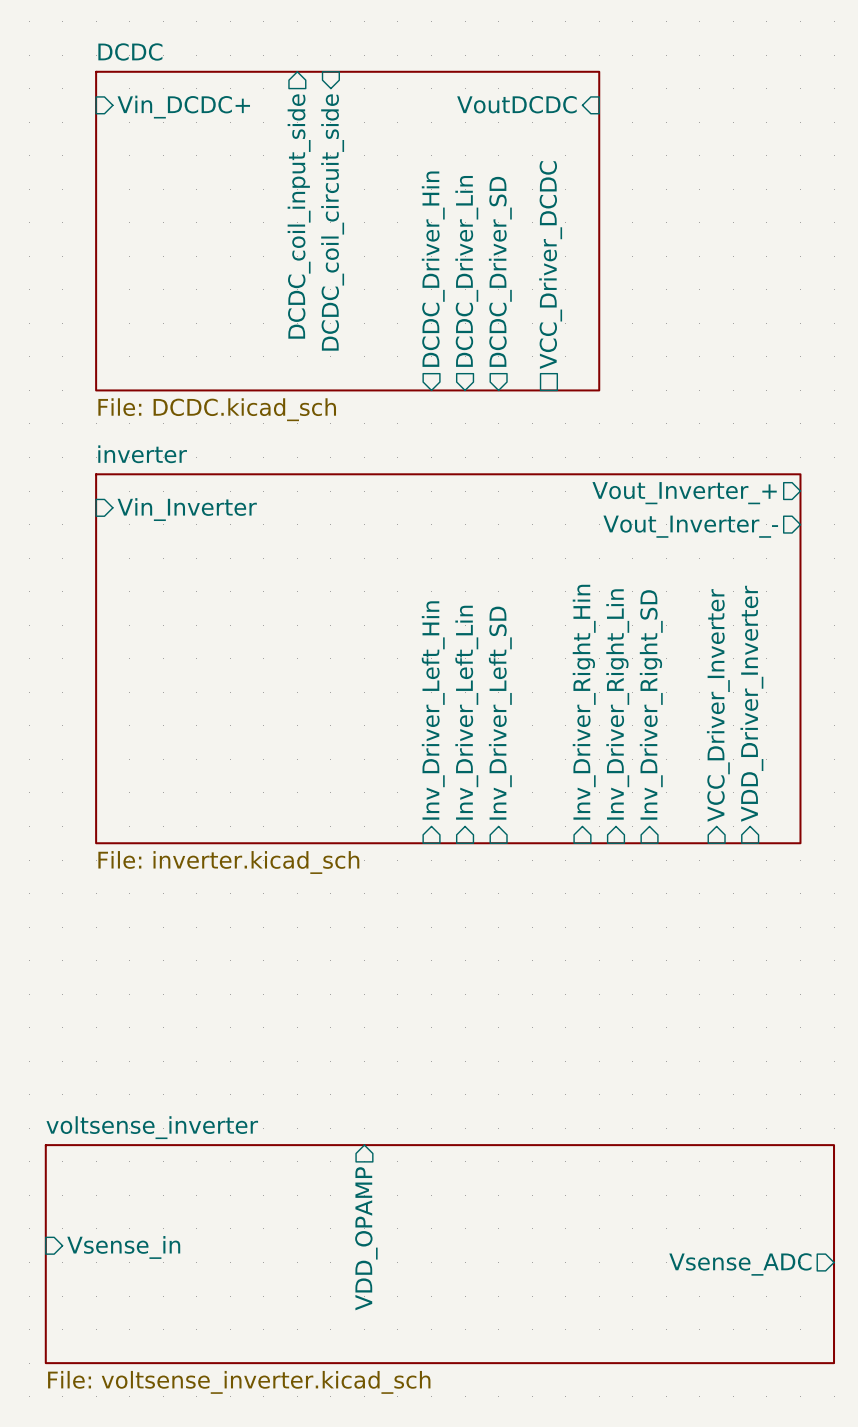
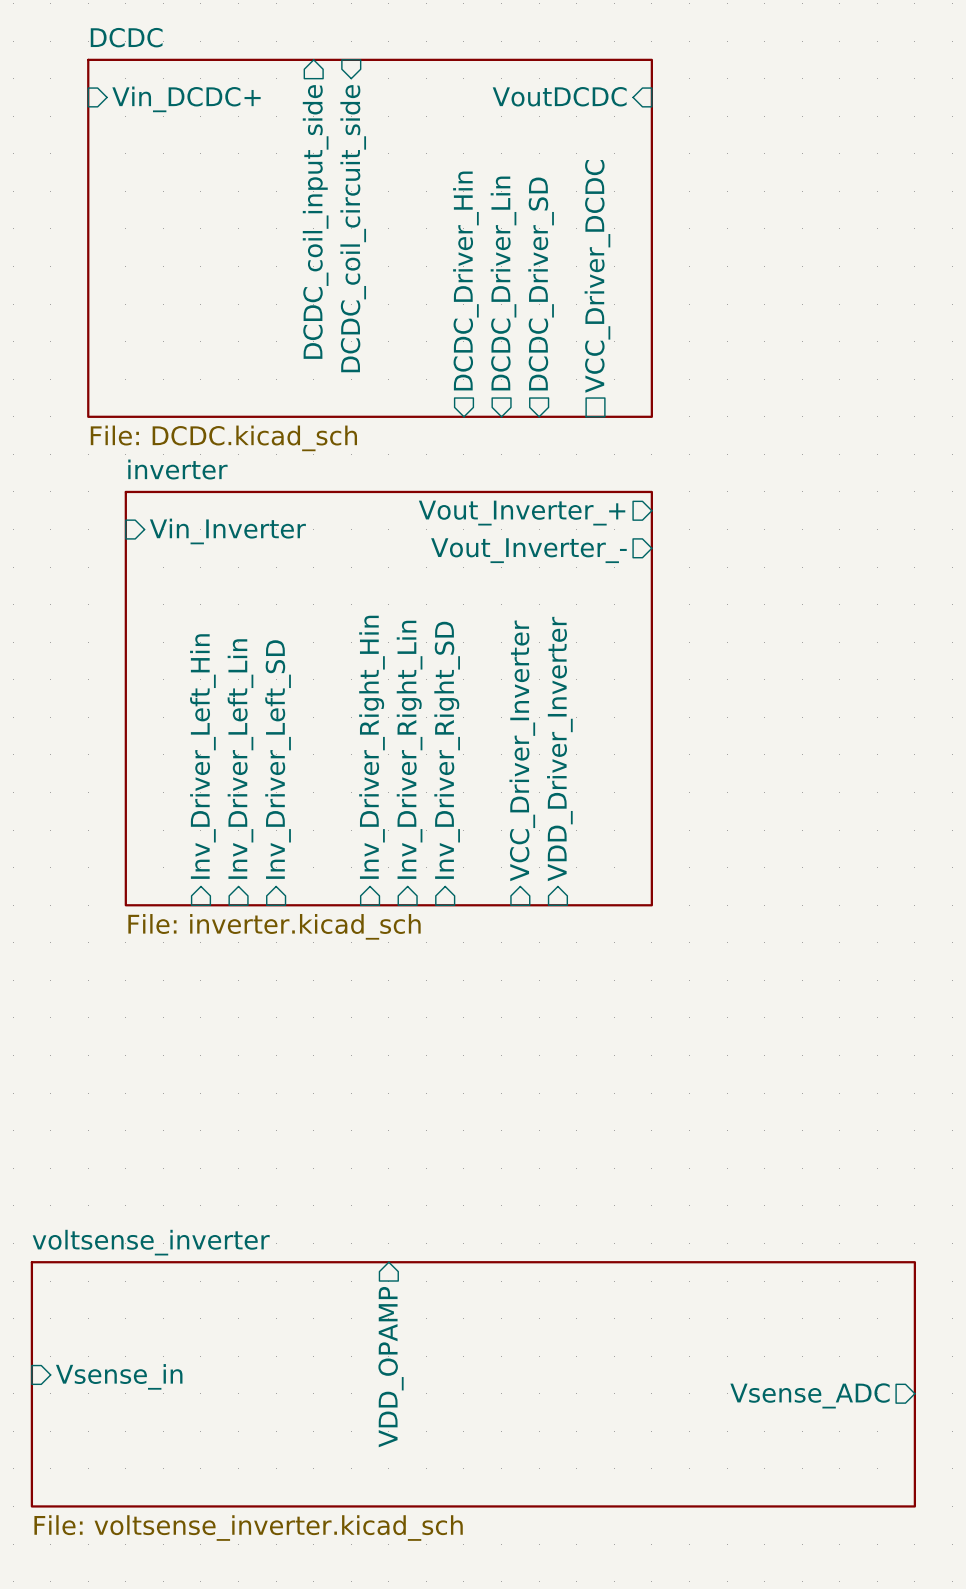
sheet pin position: Vout_Inverter_+ (684, 493) -> Vout_Inverter_+ (522, 513)
sheet pin position: Vin_Inverter (187, 509) -> Vin_Inverter (227, 531)
sheet pin position: Vout_Inverter_- (690, 526) -> Vout_Inverter_- (528, 550)
sheet inverter: none -> File: inverter.kicad_sch (388, 698)
sheet inverter: File: inverter.kicad_sch (448, 658) -> none
sheet pin position: Inv_Driver_Right_Hin (584, 702) -> Inv_Driver_Right_Hin (372, 747)
sheet pin position: VDD_Driver_Inverter (751, 703) -> VDD_Driver_Inverter (559, 749)
sheet pin position: Inv_Driver_Right_Lin (617, 704) -> Inv_Driver_Right_Lin (409, 749)
sheet pin position: Inv_Driver_Right_SD (651, 704) -> Inv_Driver_Right_SD (447, 750)
sheet pin position: VCC_Driver_Inverter (718, 705) -> VCC_Driver_Inverter (522, 750)
sheet pin position: Inv_Driver_Left_Hin (433, 710) -> Inv_Driver_Left_Hin (202, 756)
sheet pin position: Inv_Driver_Left_Lin (466, 712) -> Inv_Driver_Left_Lin (240, 759)
sheet pin position: Inv_Driver_Left_SD (500, 713) -> Inv_Driver_Left_SD (278, 759)

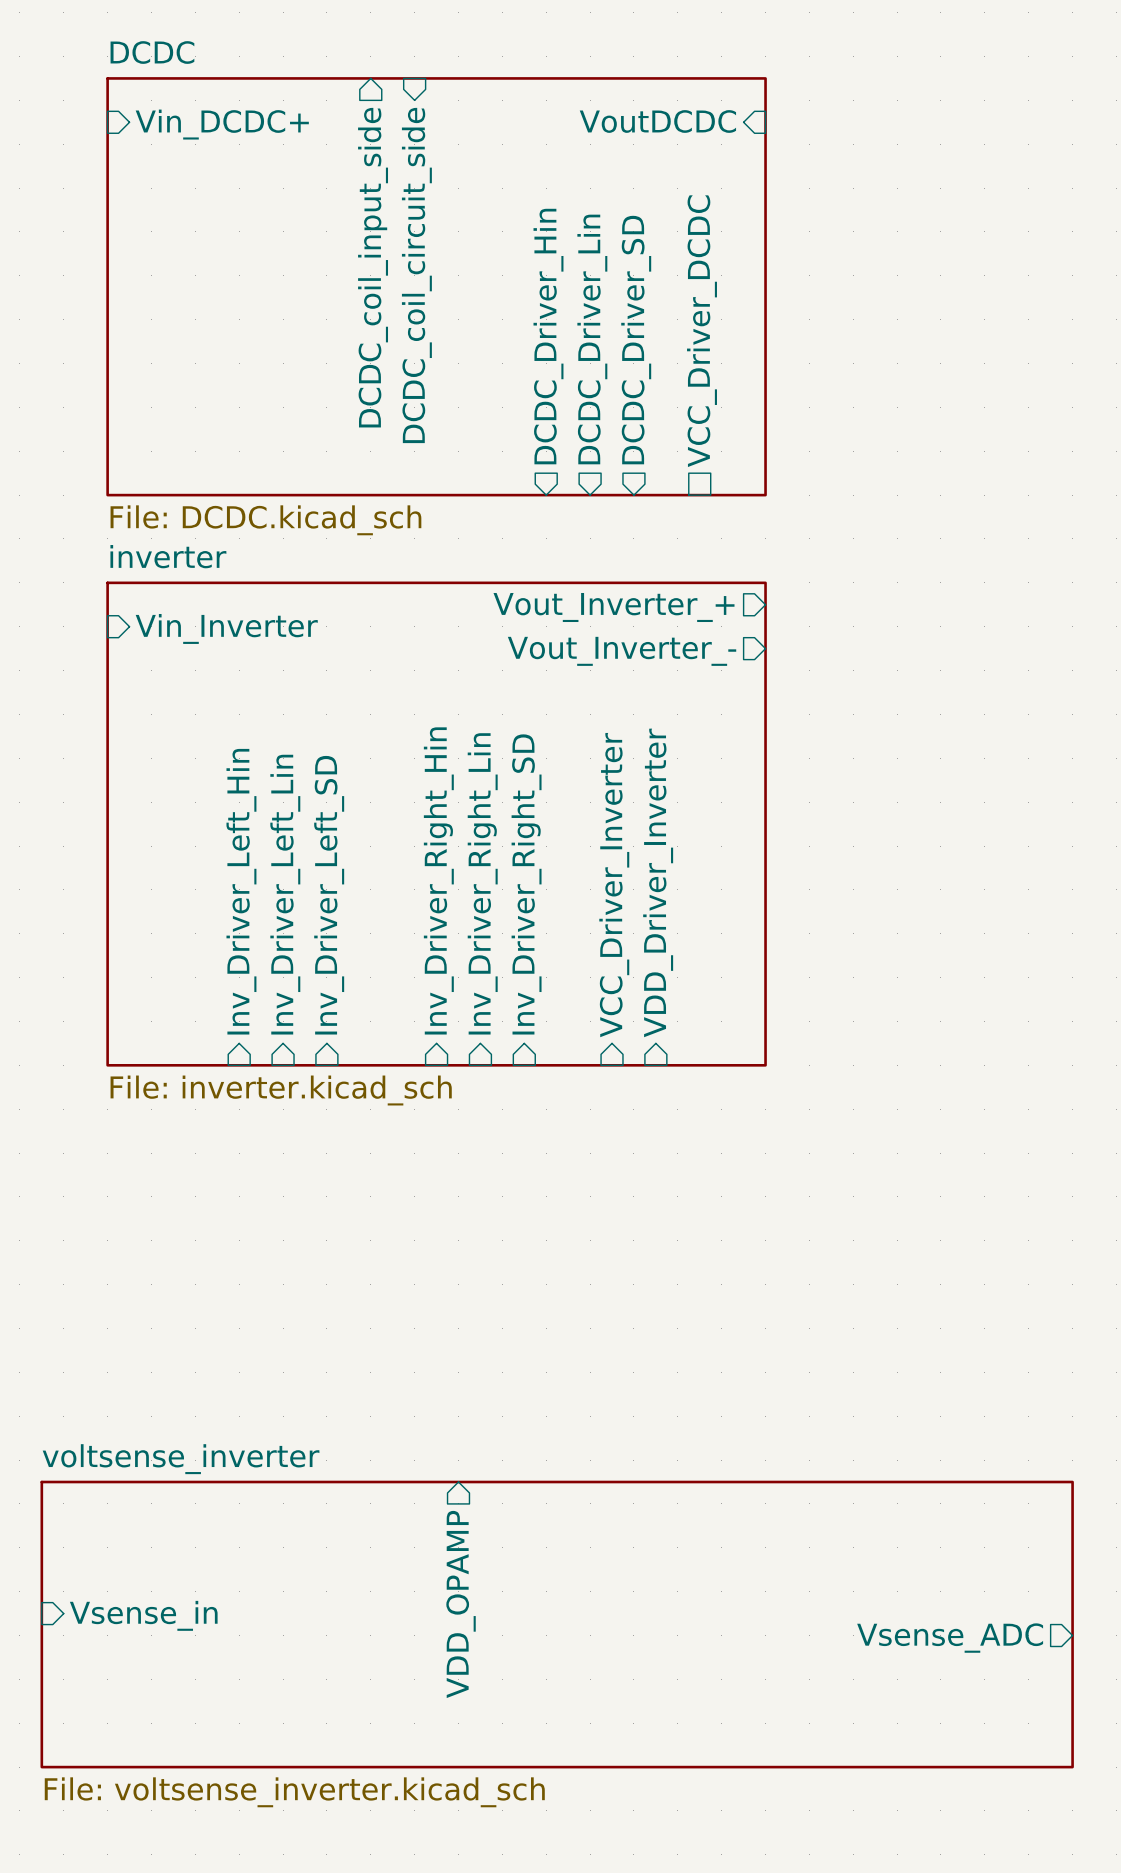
sheet pin position: Vin_Inverter (227, 531) -> Vin_Inverter (226, 628)
sheet inverter: none -> File: inverter.kicad_sch (436, 824)
sheet inverter: File: inverter.kicad_sch (388, 698) -> none

